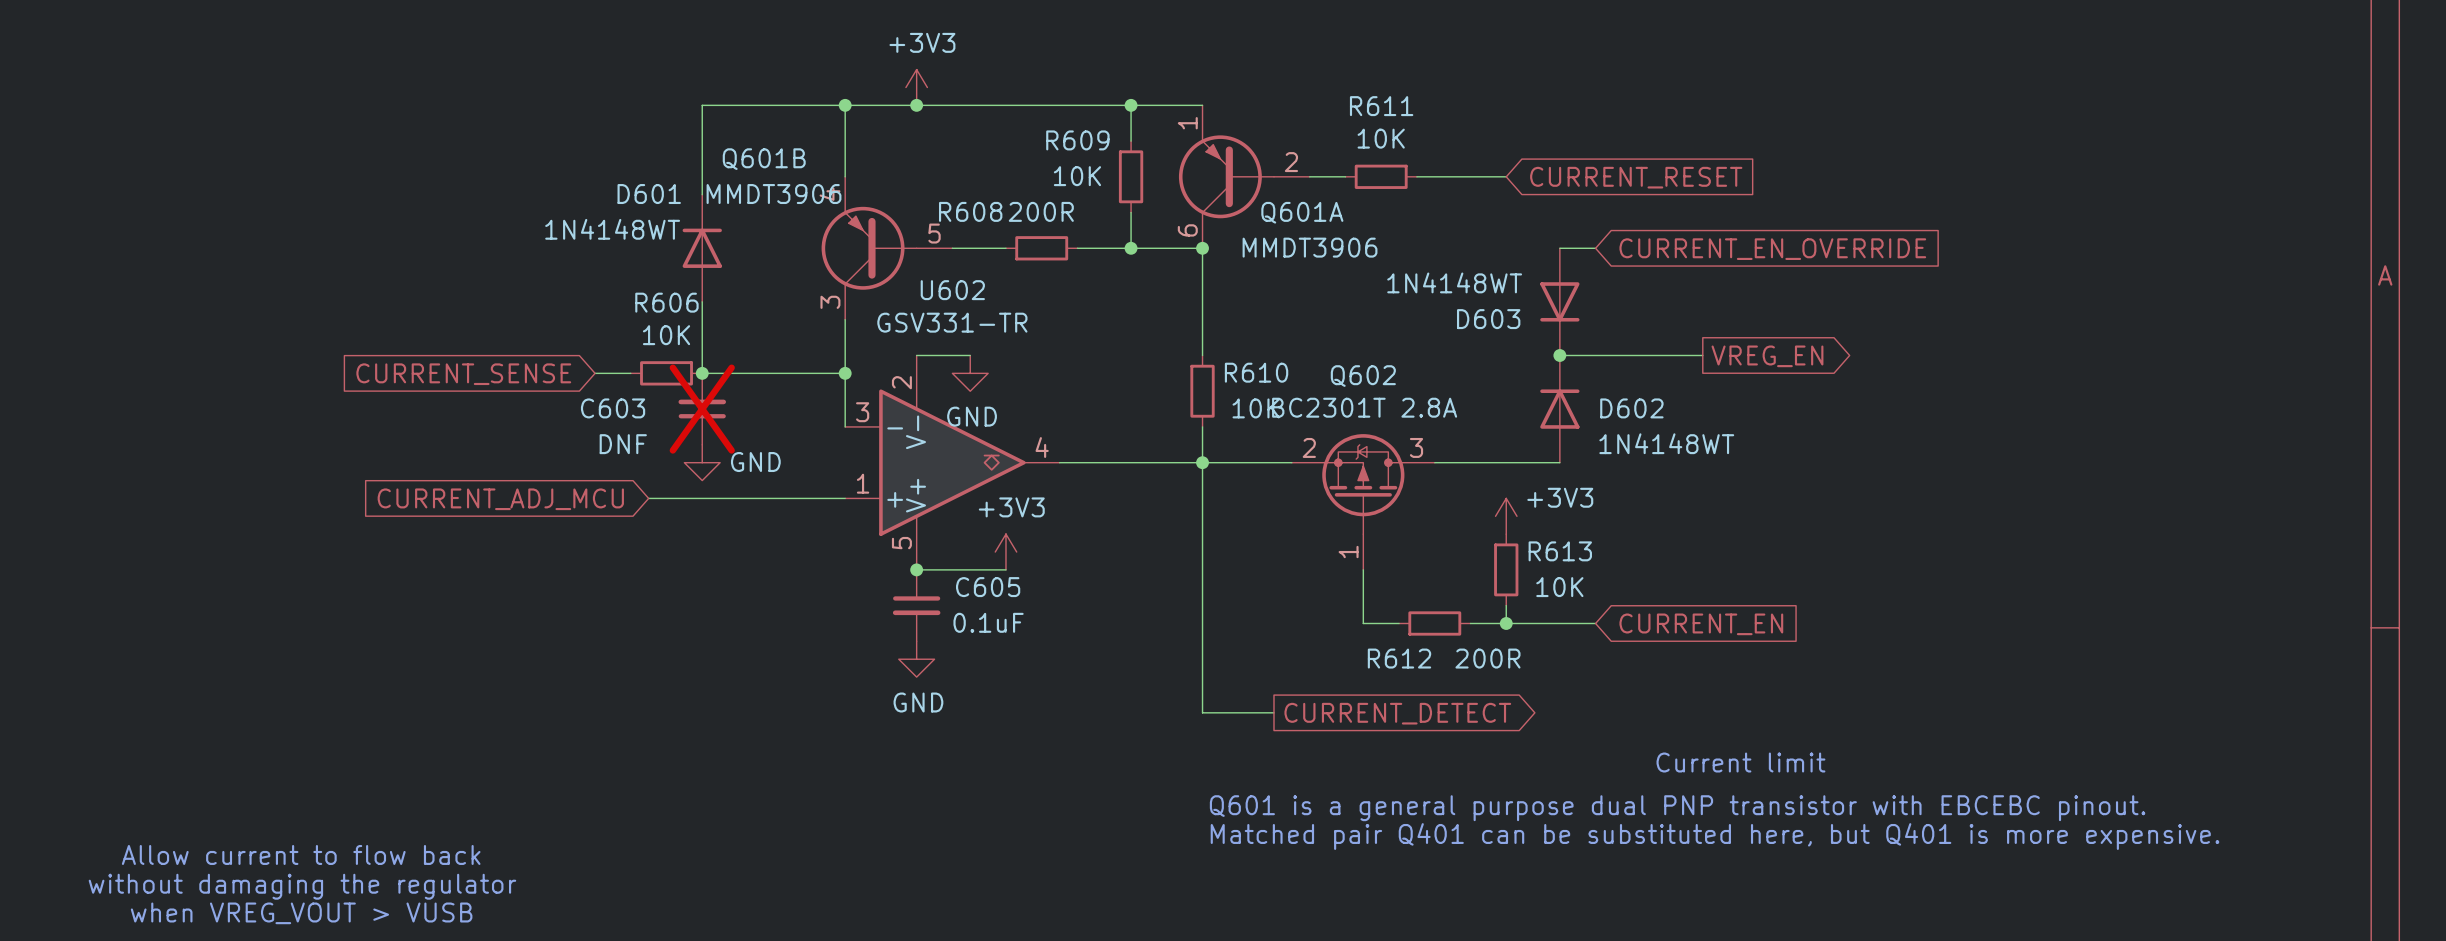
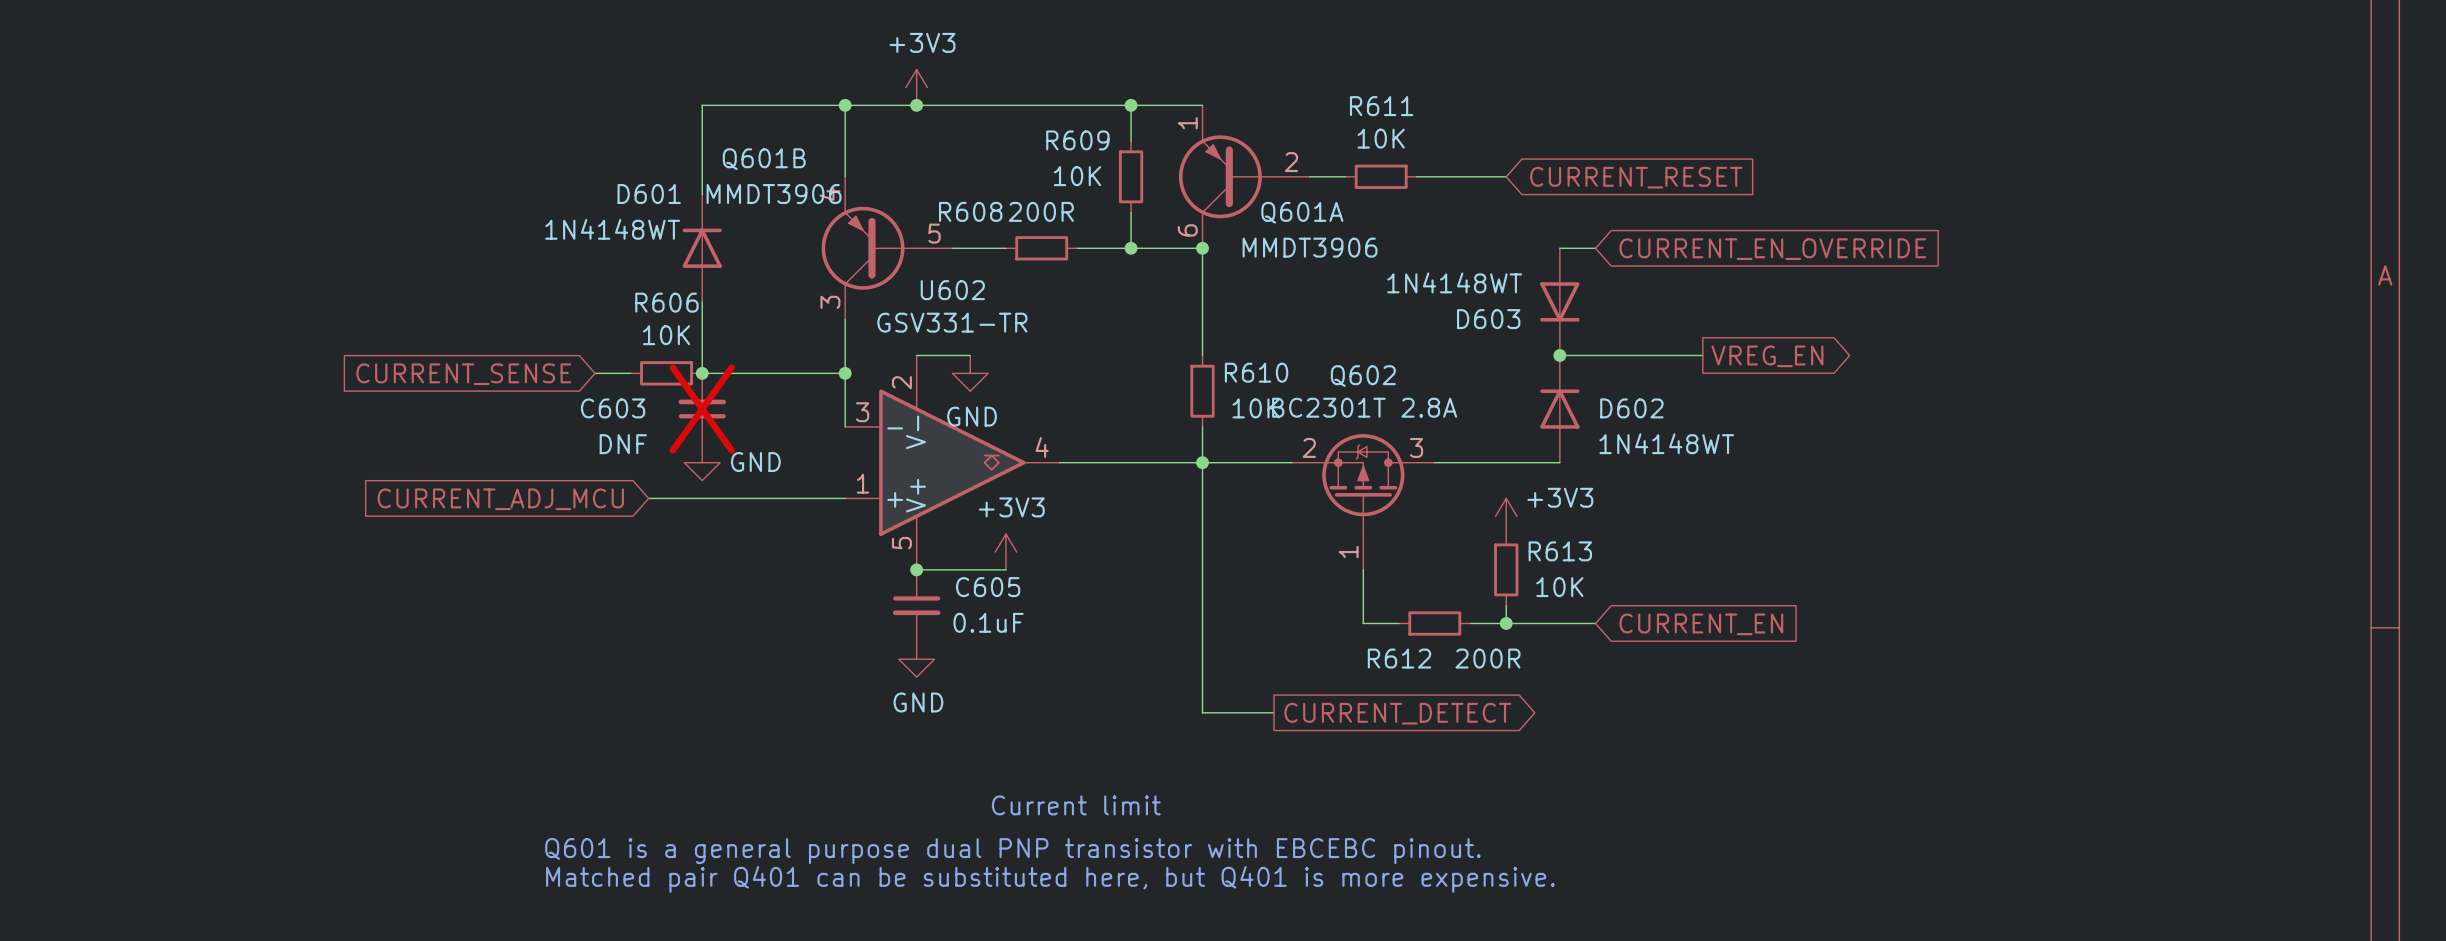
text: Current limit (1740, 762) -> none
text: none -> Current limit (1076, 805)
text: Q601 is a general purpose dual PNP transistor with EBCEBC pinout. (1677, 808) -> none
text: Matched pair Q401 can be substituted here, but Q401 is more expensive. (1715, 836) -> none
text: none -> Q601 is a general purpose dual PNP transistor with EBCEBC pinout. (1012, 851)
text: Allow current to flow back (301, 854) -> none
text: none -> Matched pair Q401 can be substituted here, but Q401 is more expensive. (1050, 879)
text: without damaging the regulator (302, 886) -> none
text: when VREG_VOUT > VUSB (301, 913) -> none

